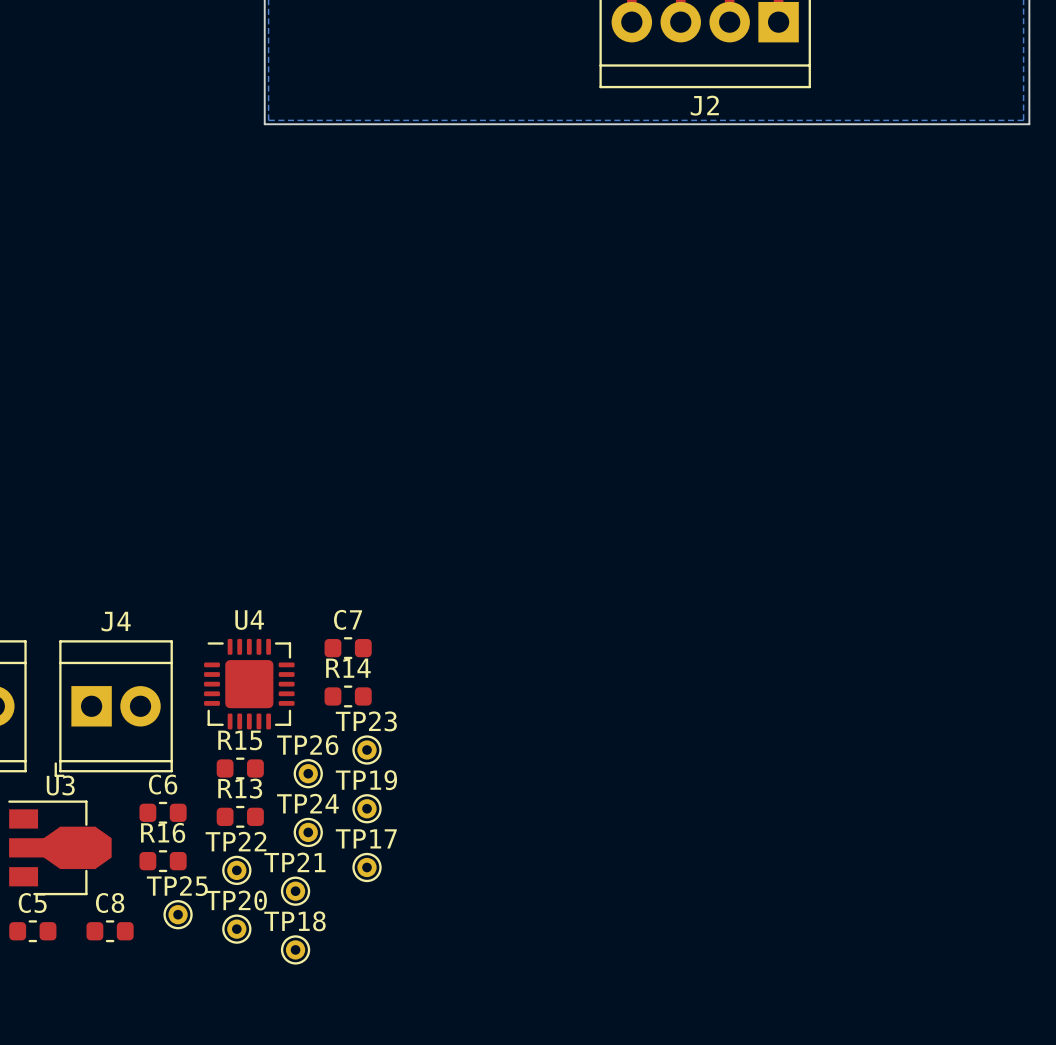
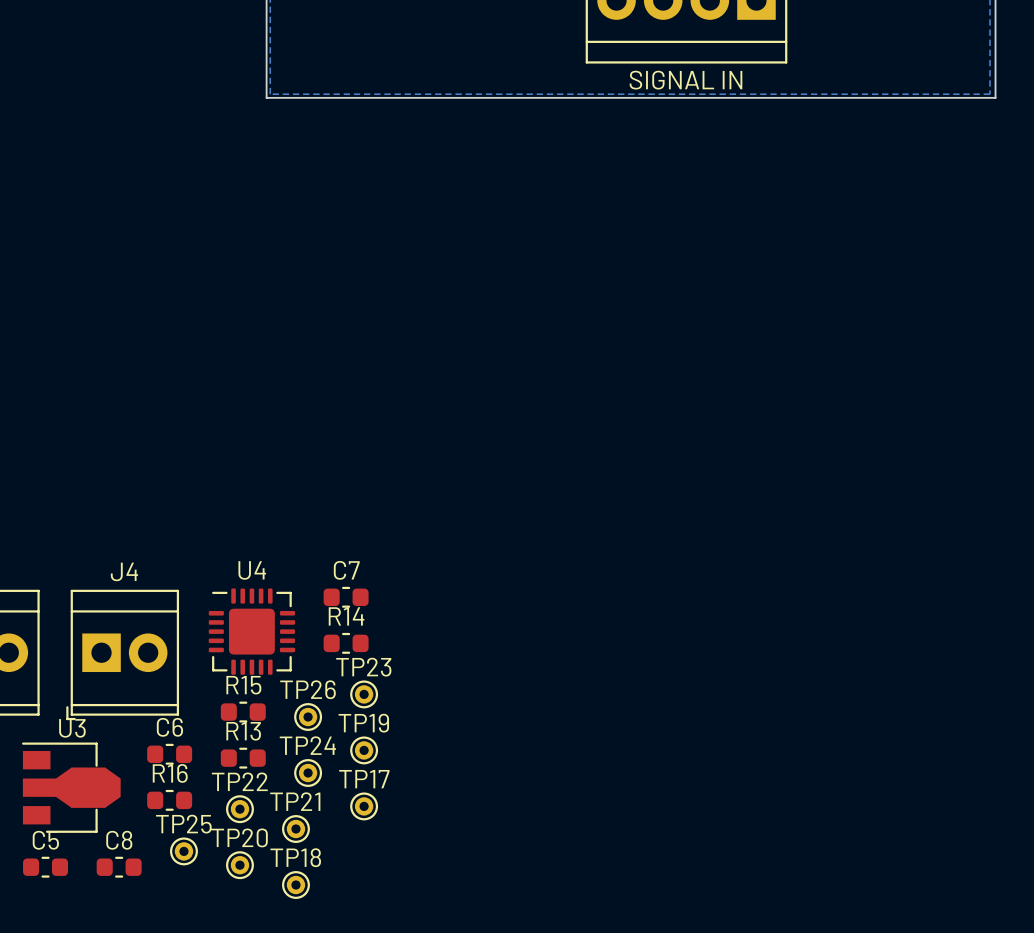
J2 name: J2 (704, 105) -> SIGNAL IN (685, 80)

